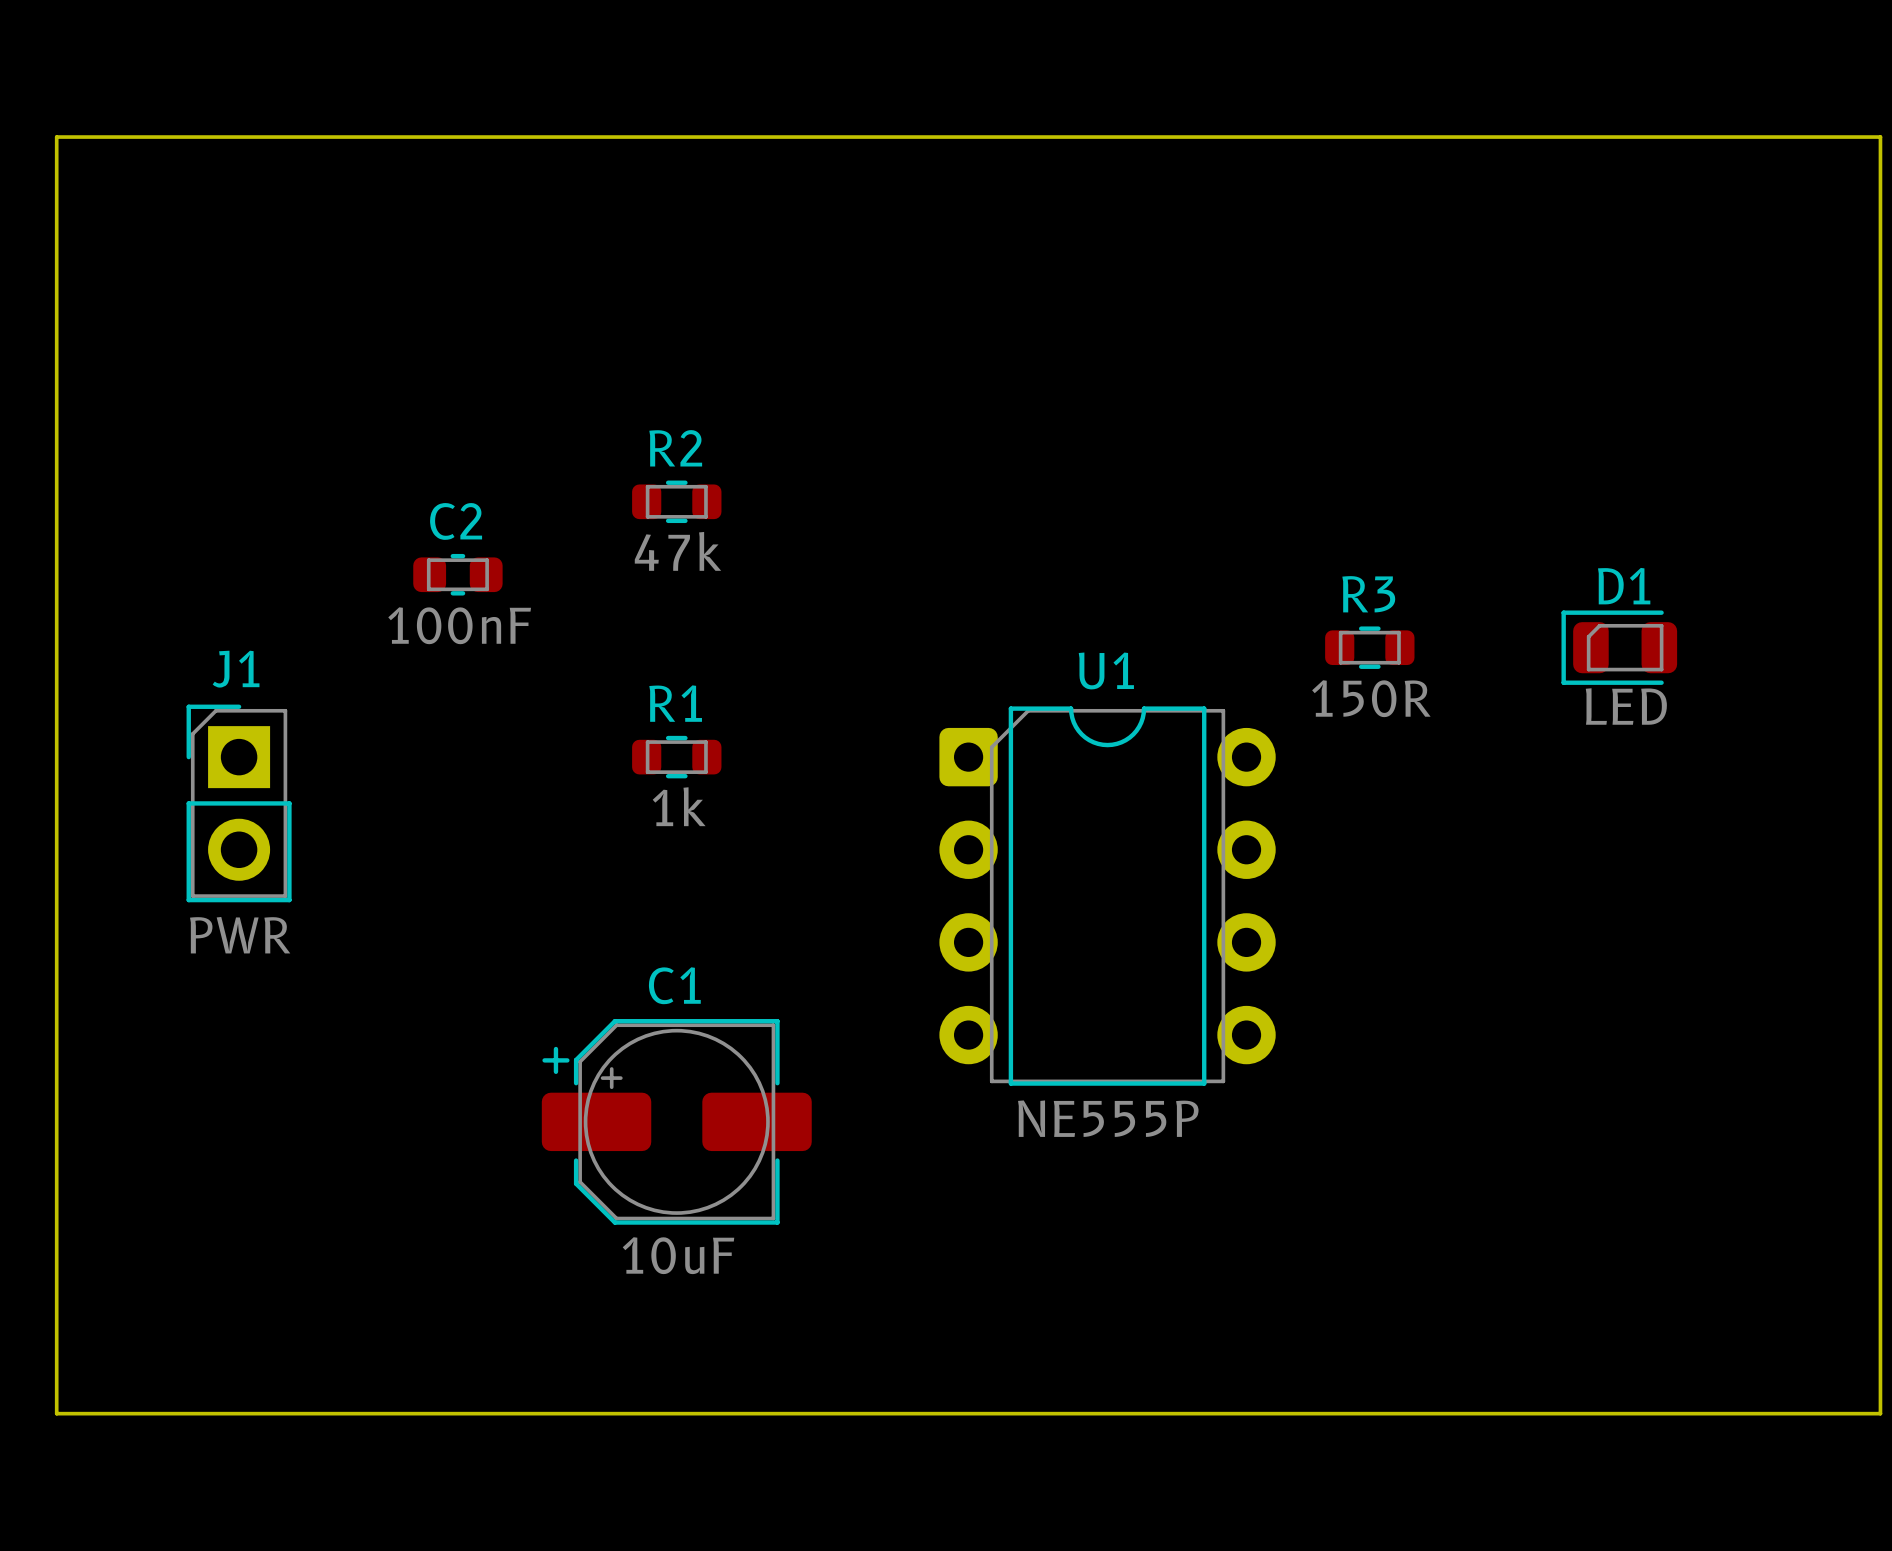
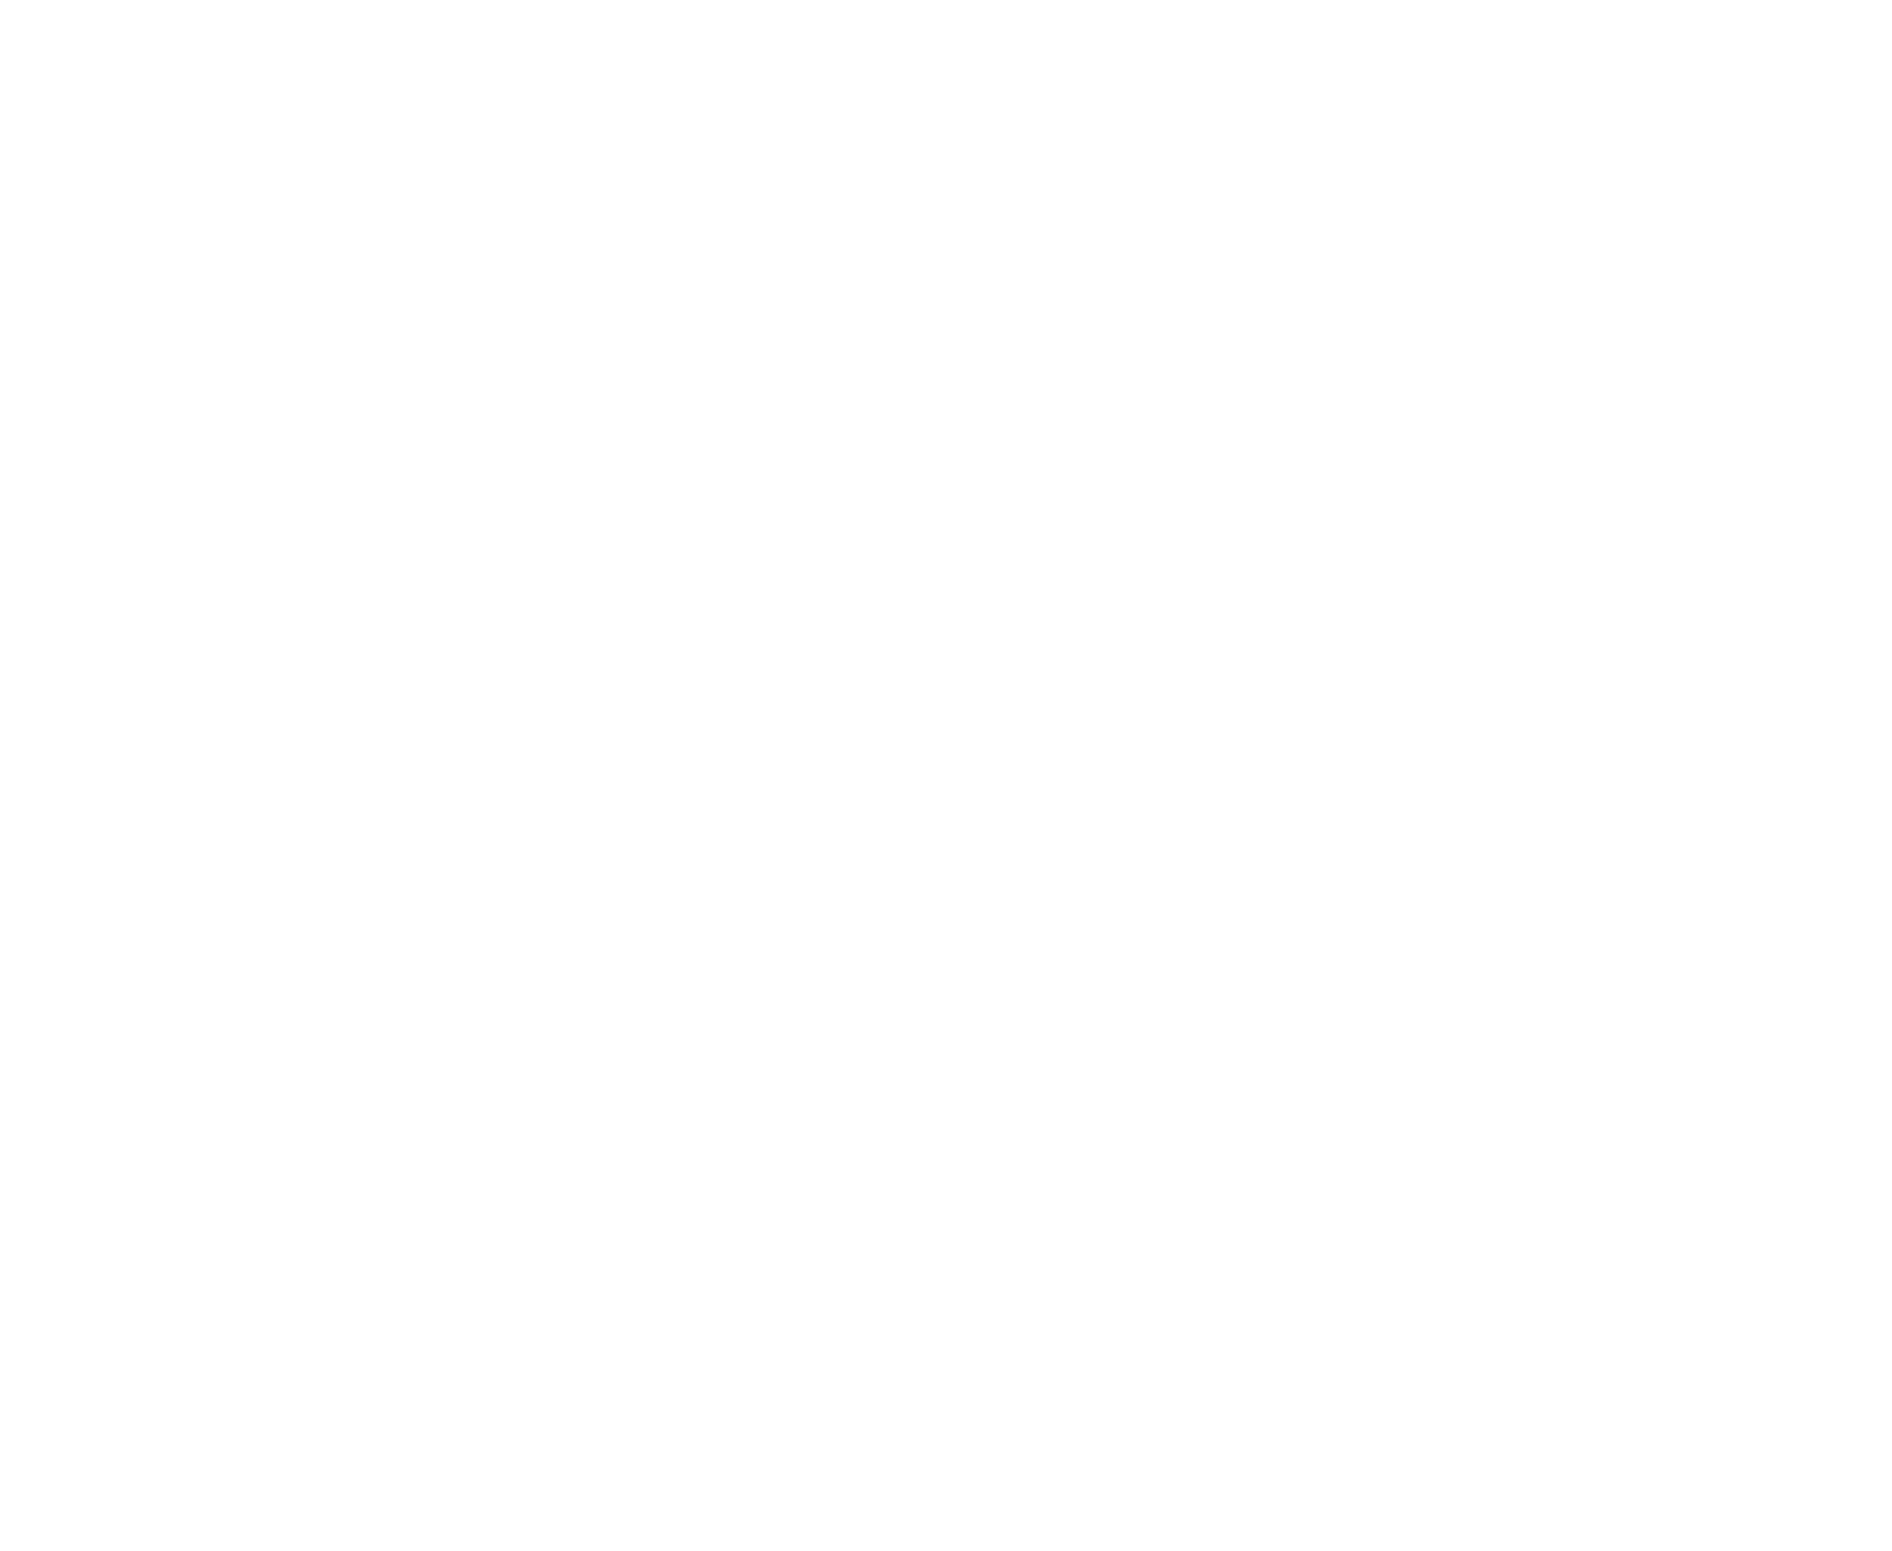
board edge: (56, 137) (56, 1413) (1880, 1413) (1880, 137) (56, 137) -> none
R2: 47k (676, 501) -> none
C2: 100nF (457, 574) -> none
R3: 150R (1369, 647) -> none
D1: LED (1619, 647) -> none
R1: 1k (676, 757) -> none
J1: PWR (239, 803) -> none
U1: NE555P (1107, 896) -> none
C1: 10uF (676, 1121) -> none

